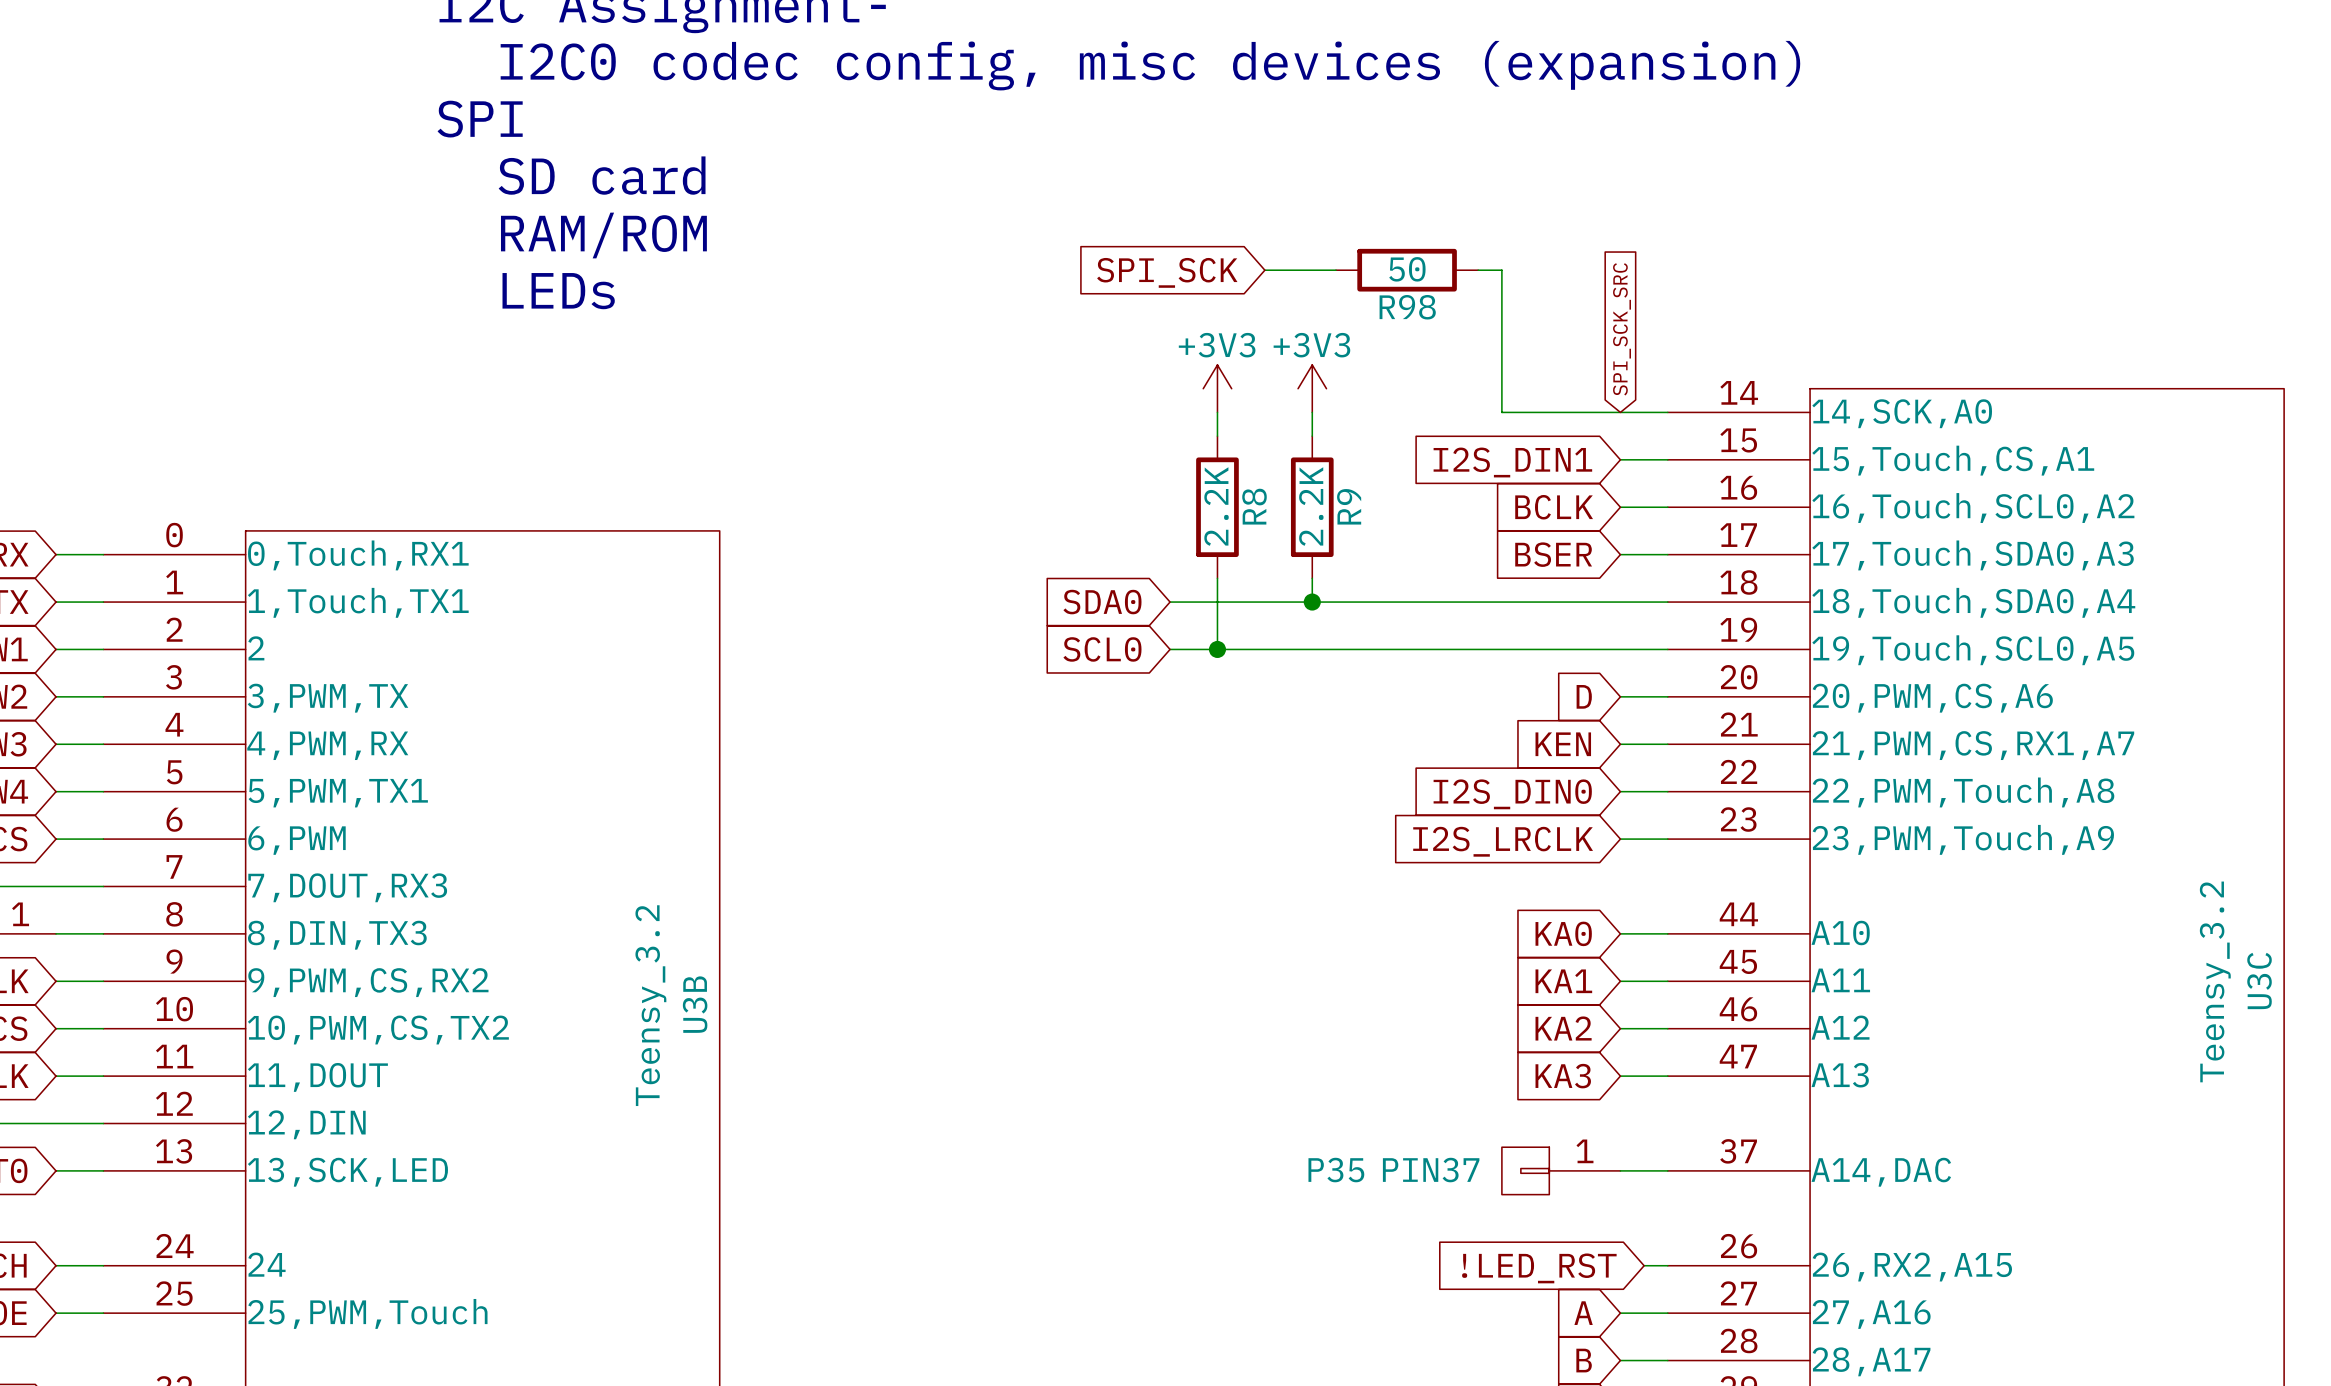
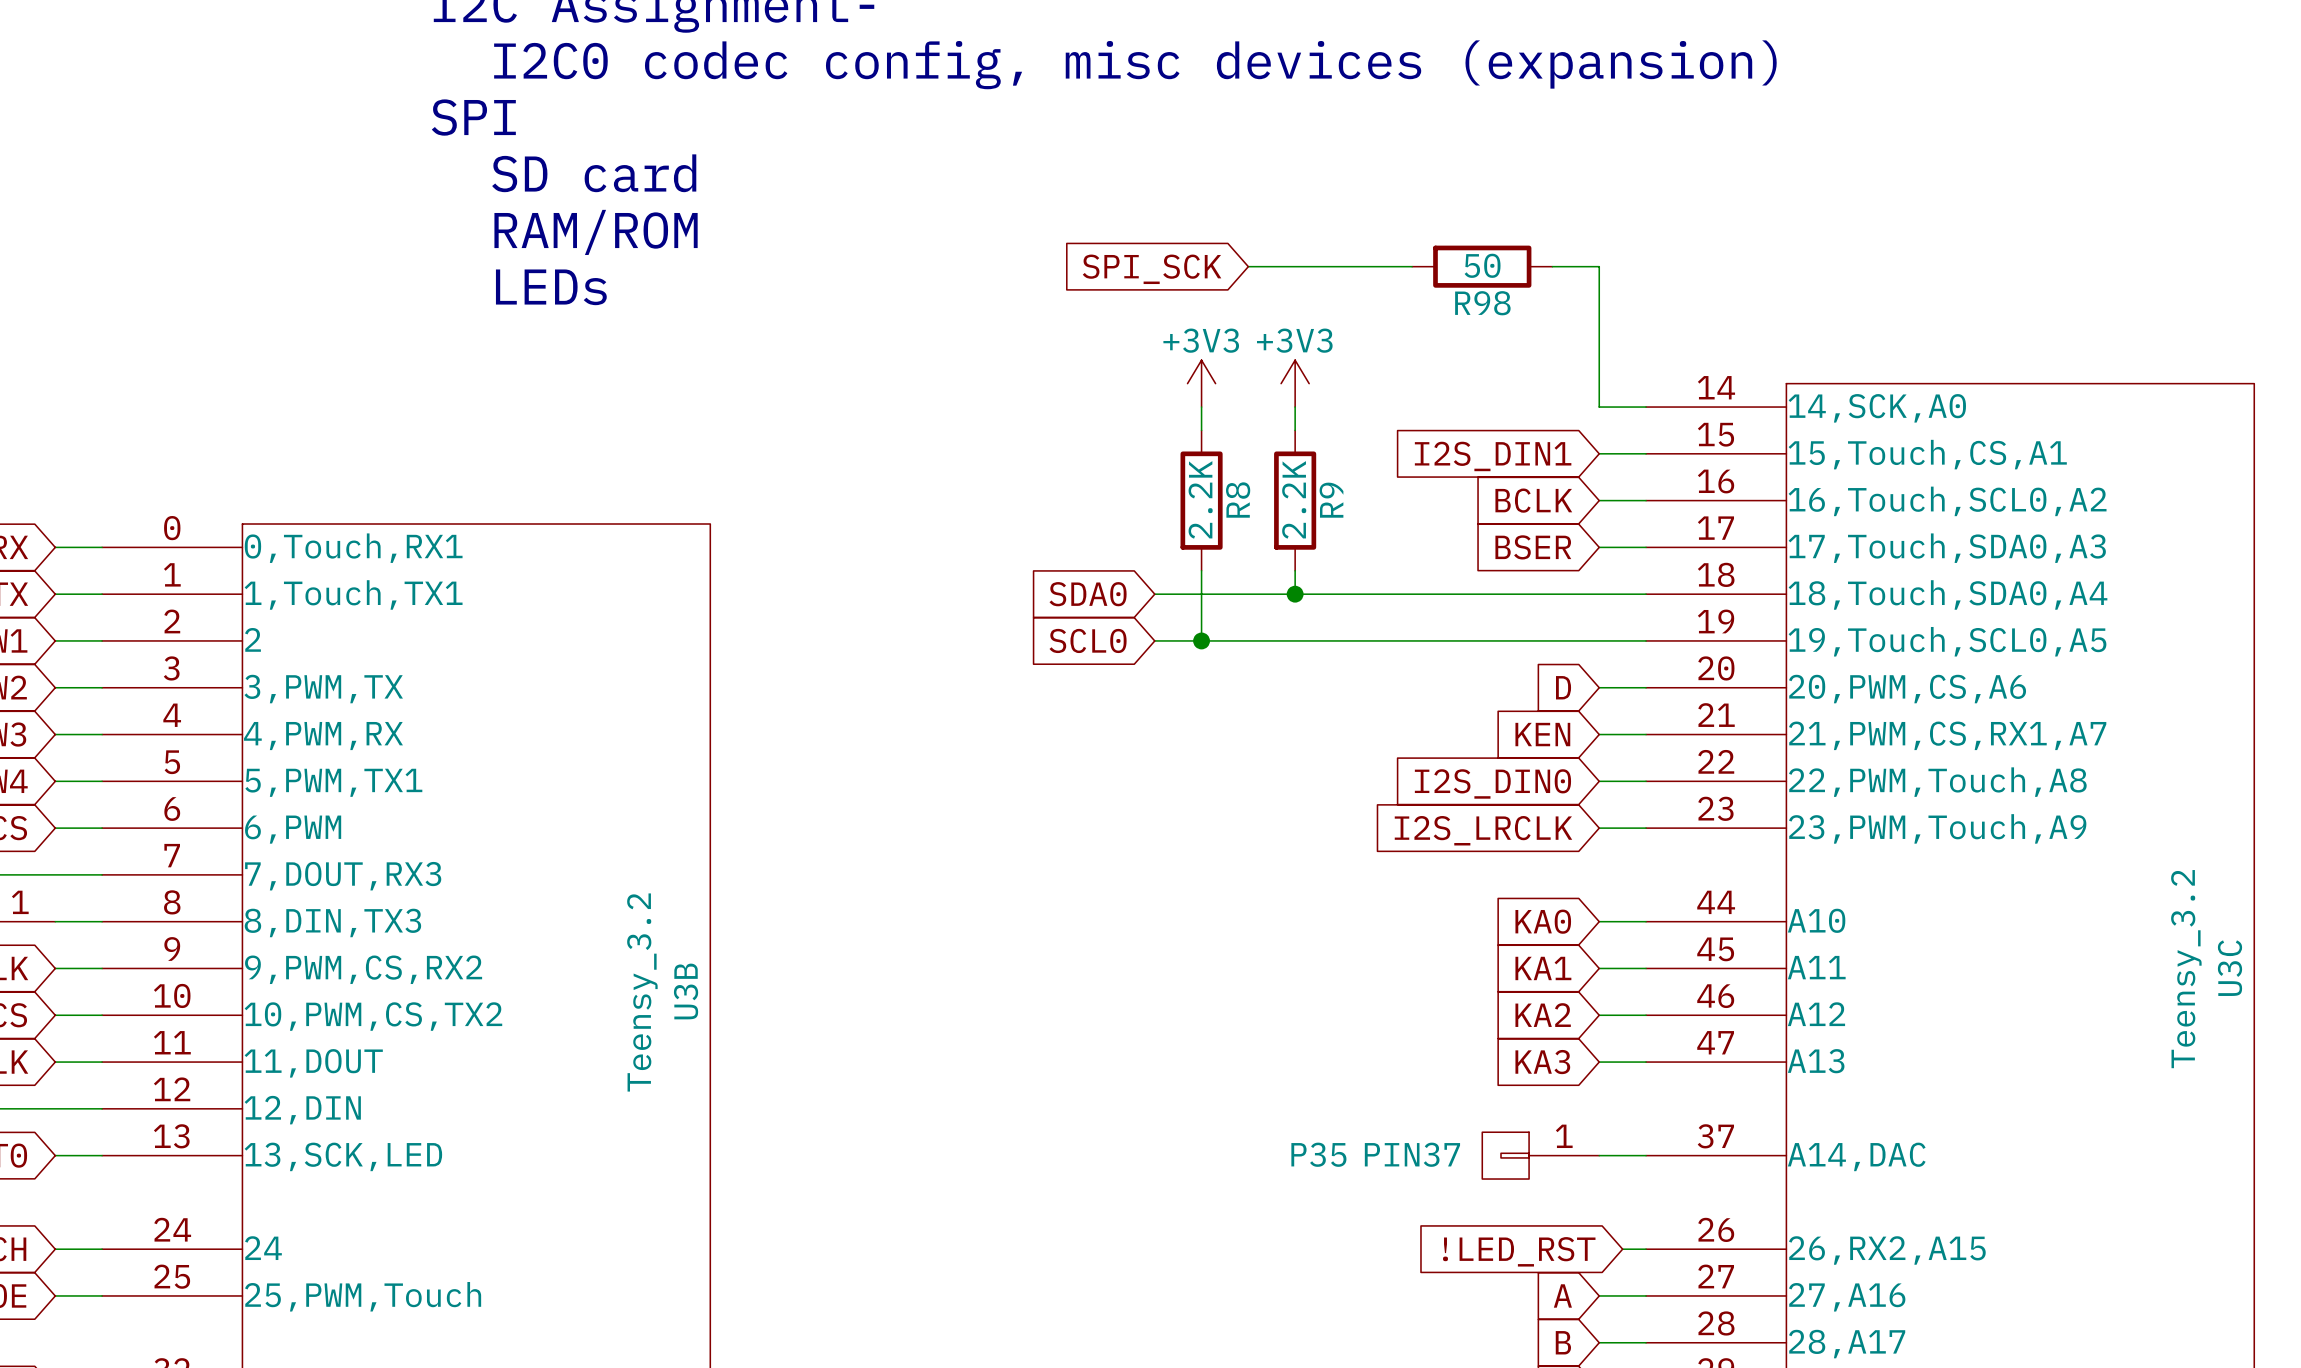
wire: none -> (1318, 266) (1412, 266)
R98 position: (1407, 270) -> (1482, 266)
wire: (1478, 270) (1501, 270) (1501, 412) (1620, 412) -> (1552, 266) (1599, 266) (1599, 407)
global label: SPI_SCK_SRC (1622, 329) -> none

